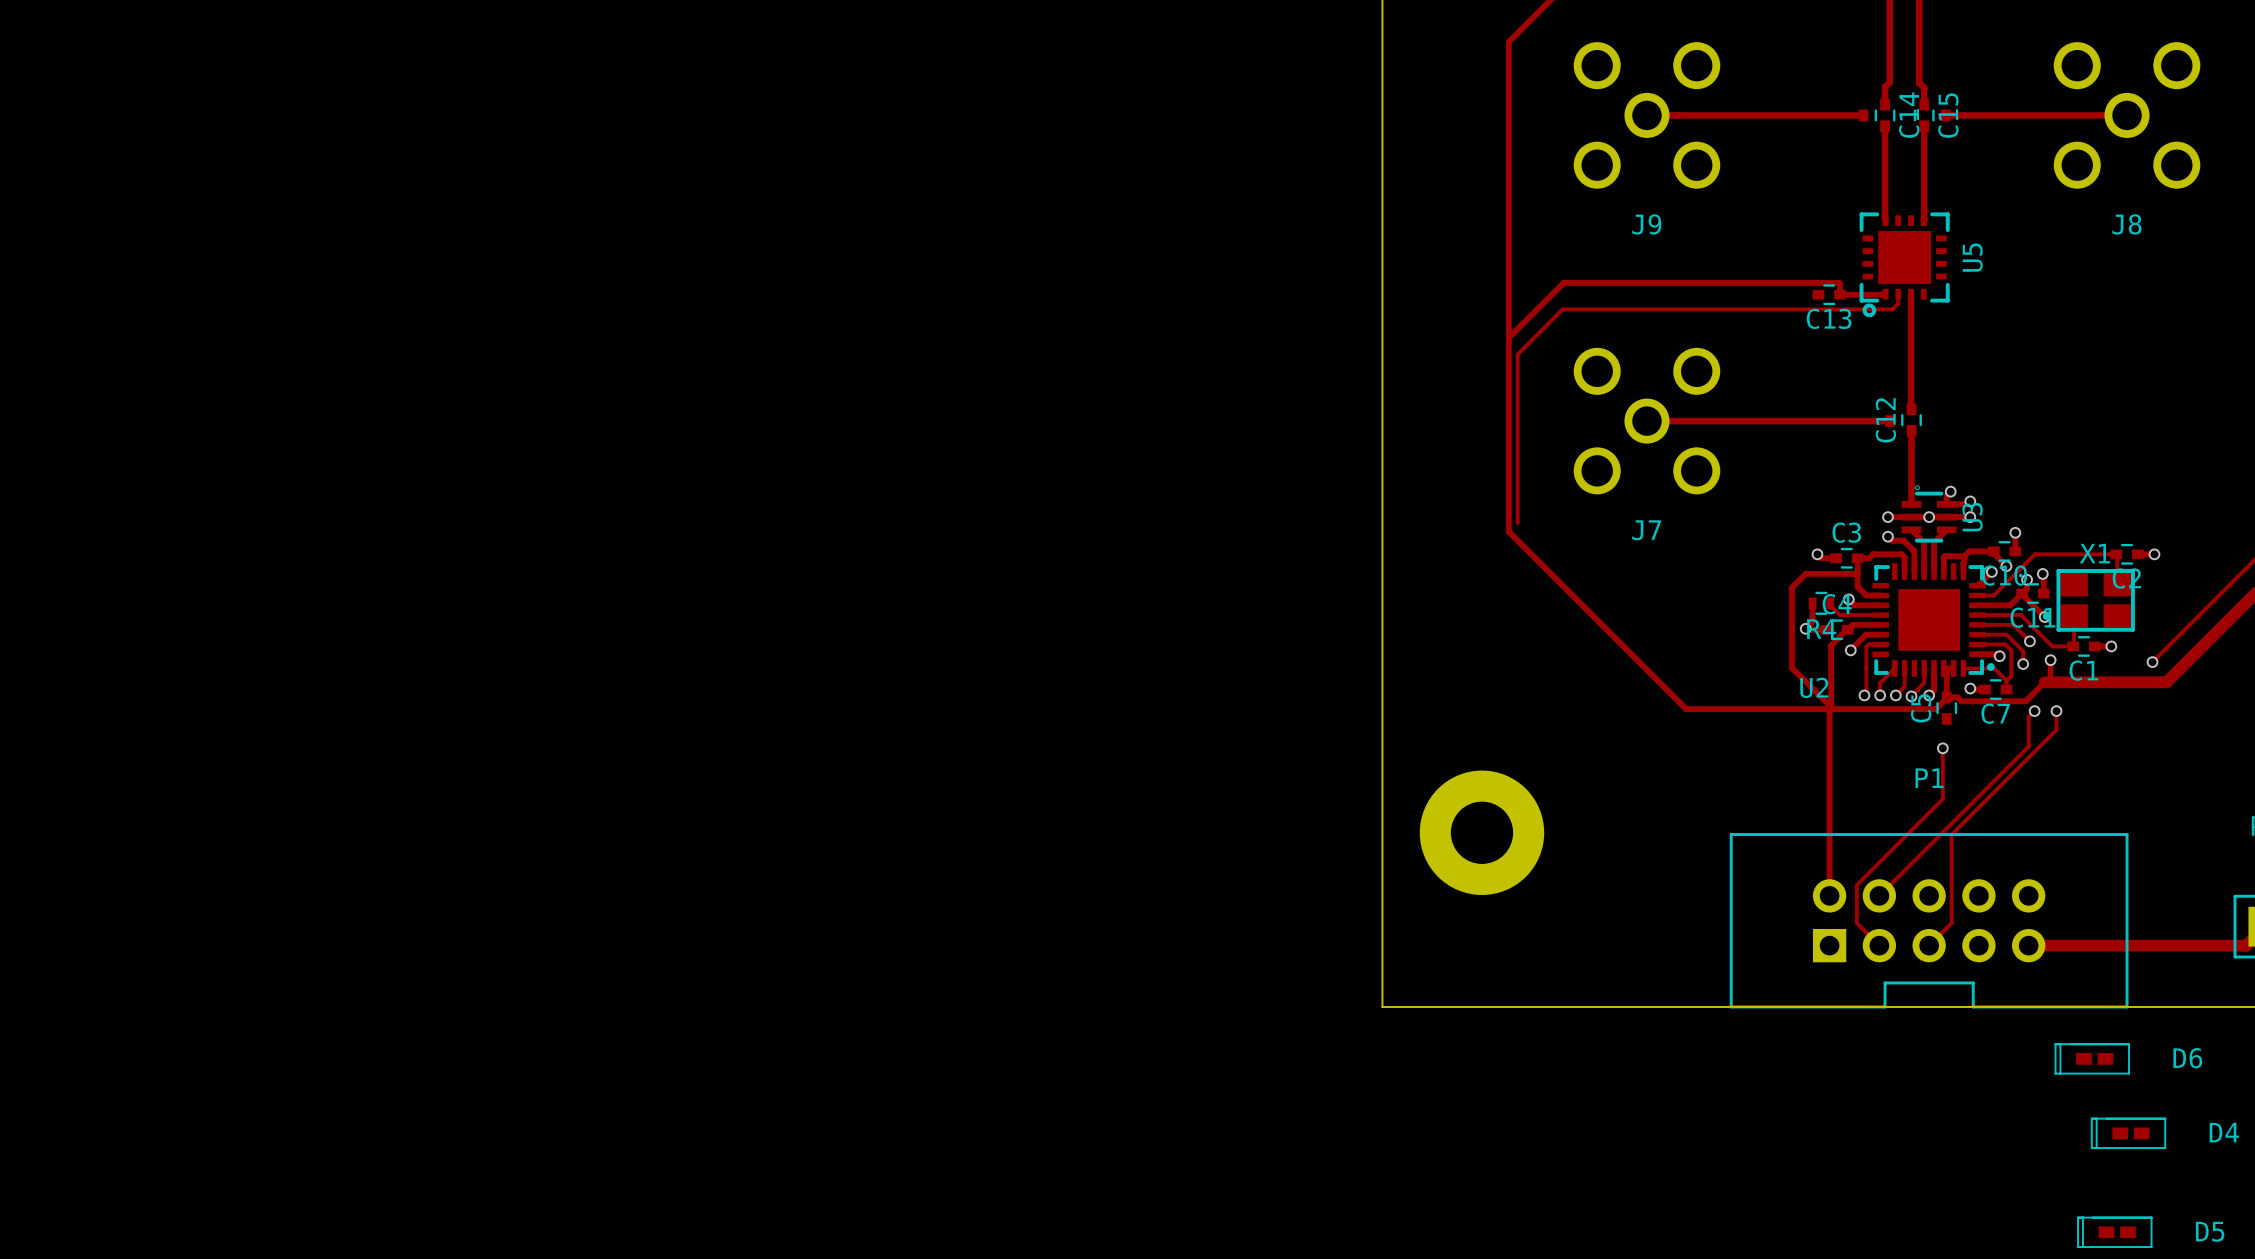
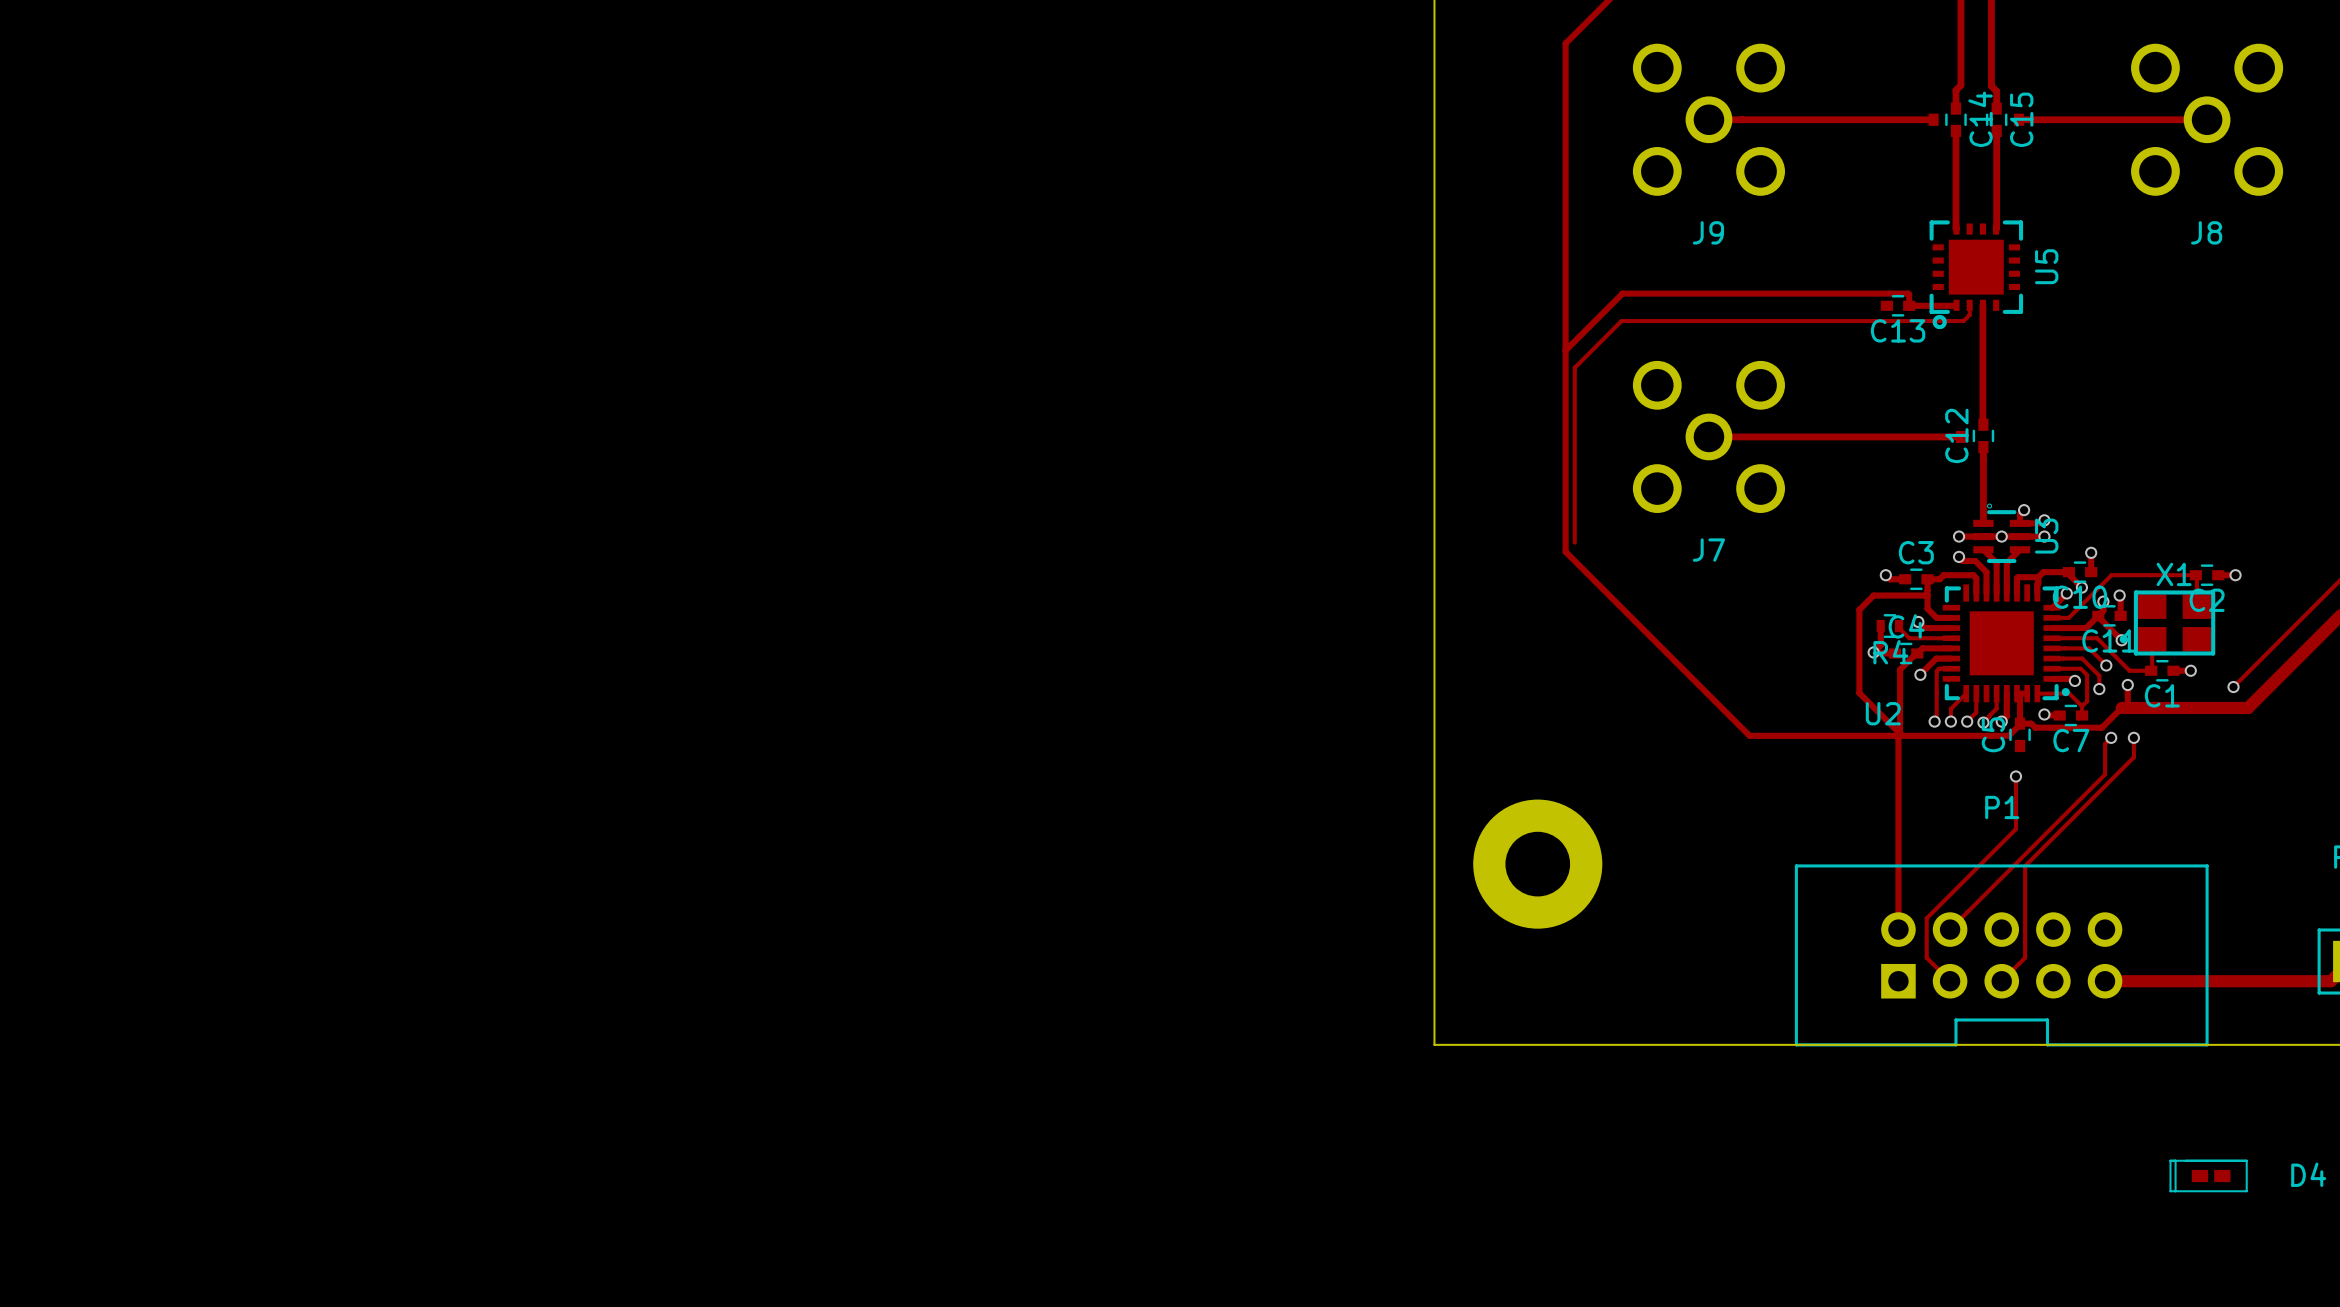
D6: (2092, 1058) -> none
D5: (2114, 1232) -> none

